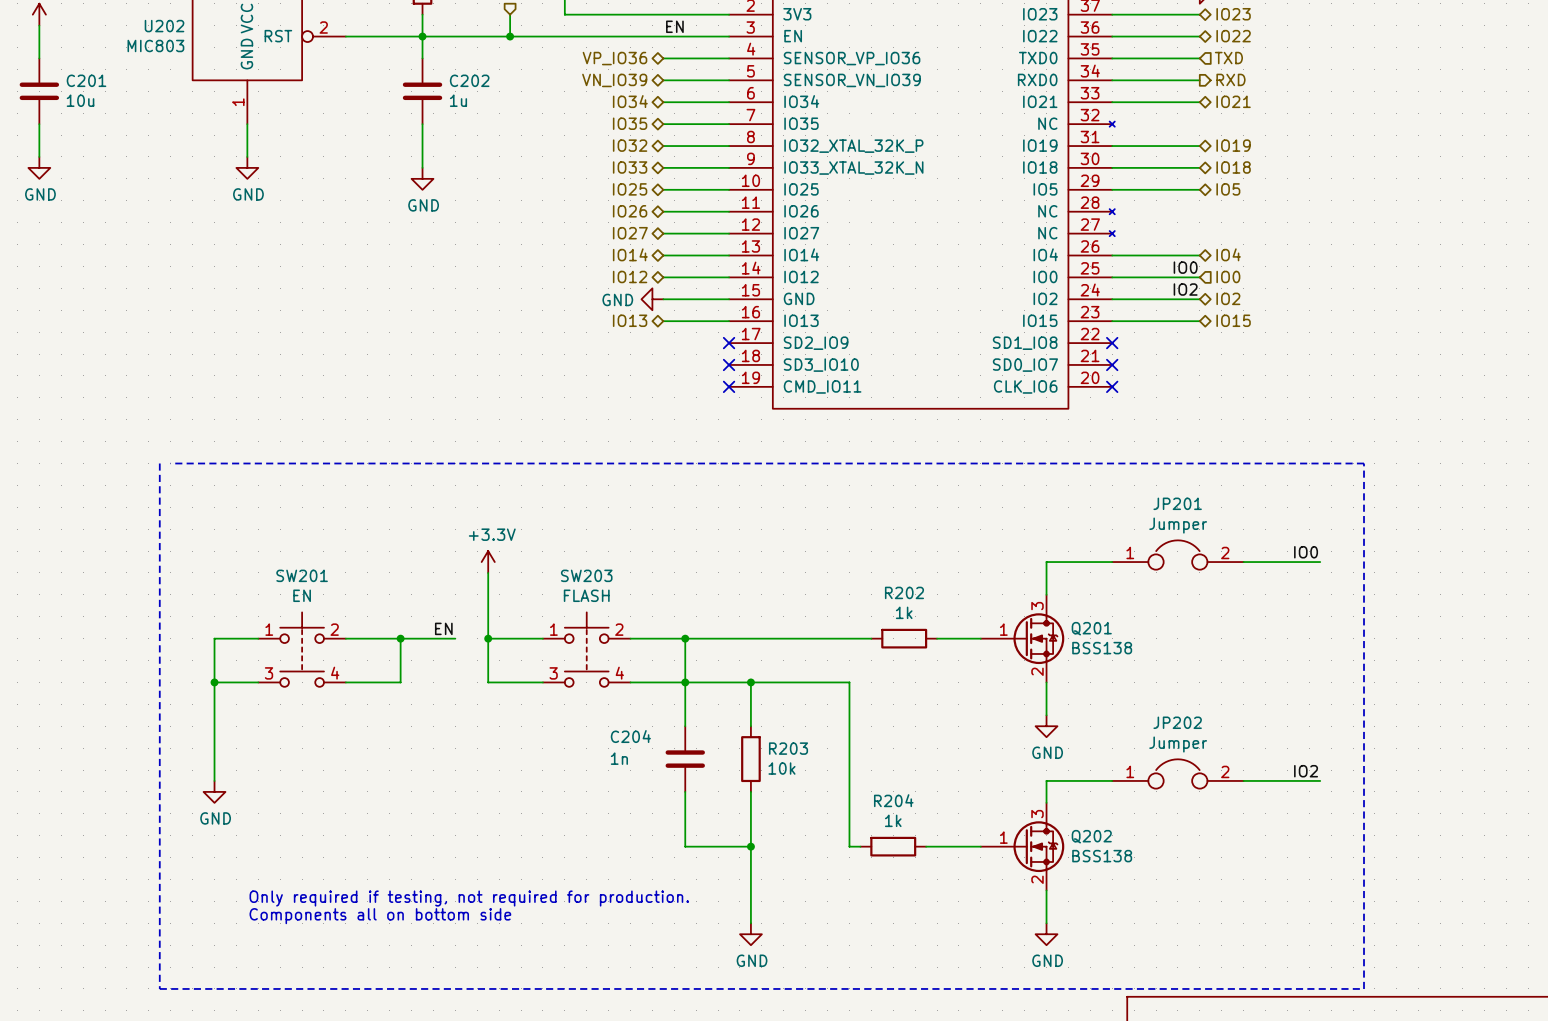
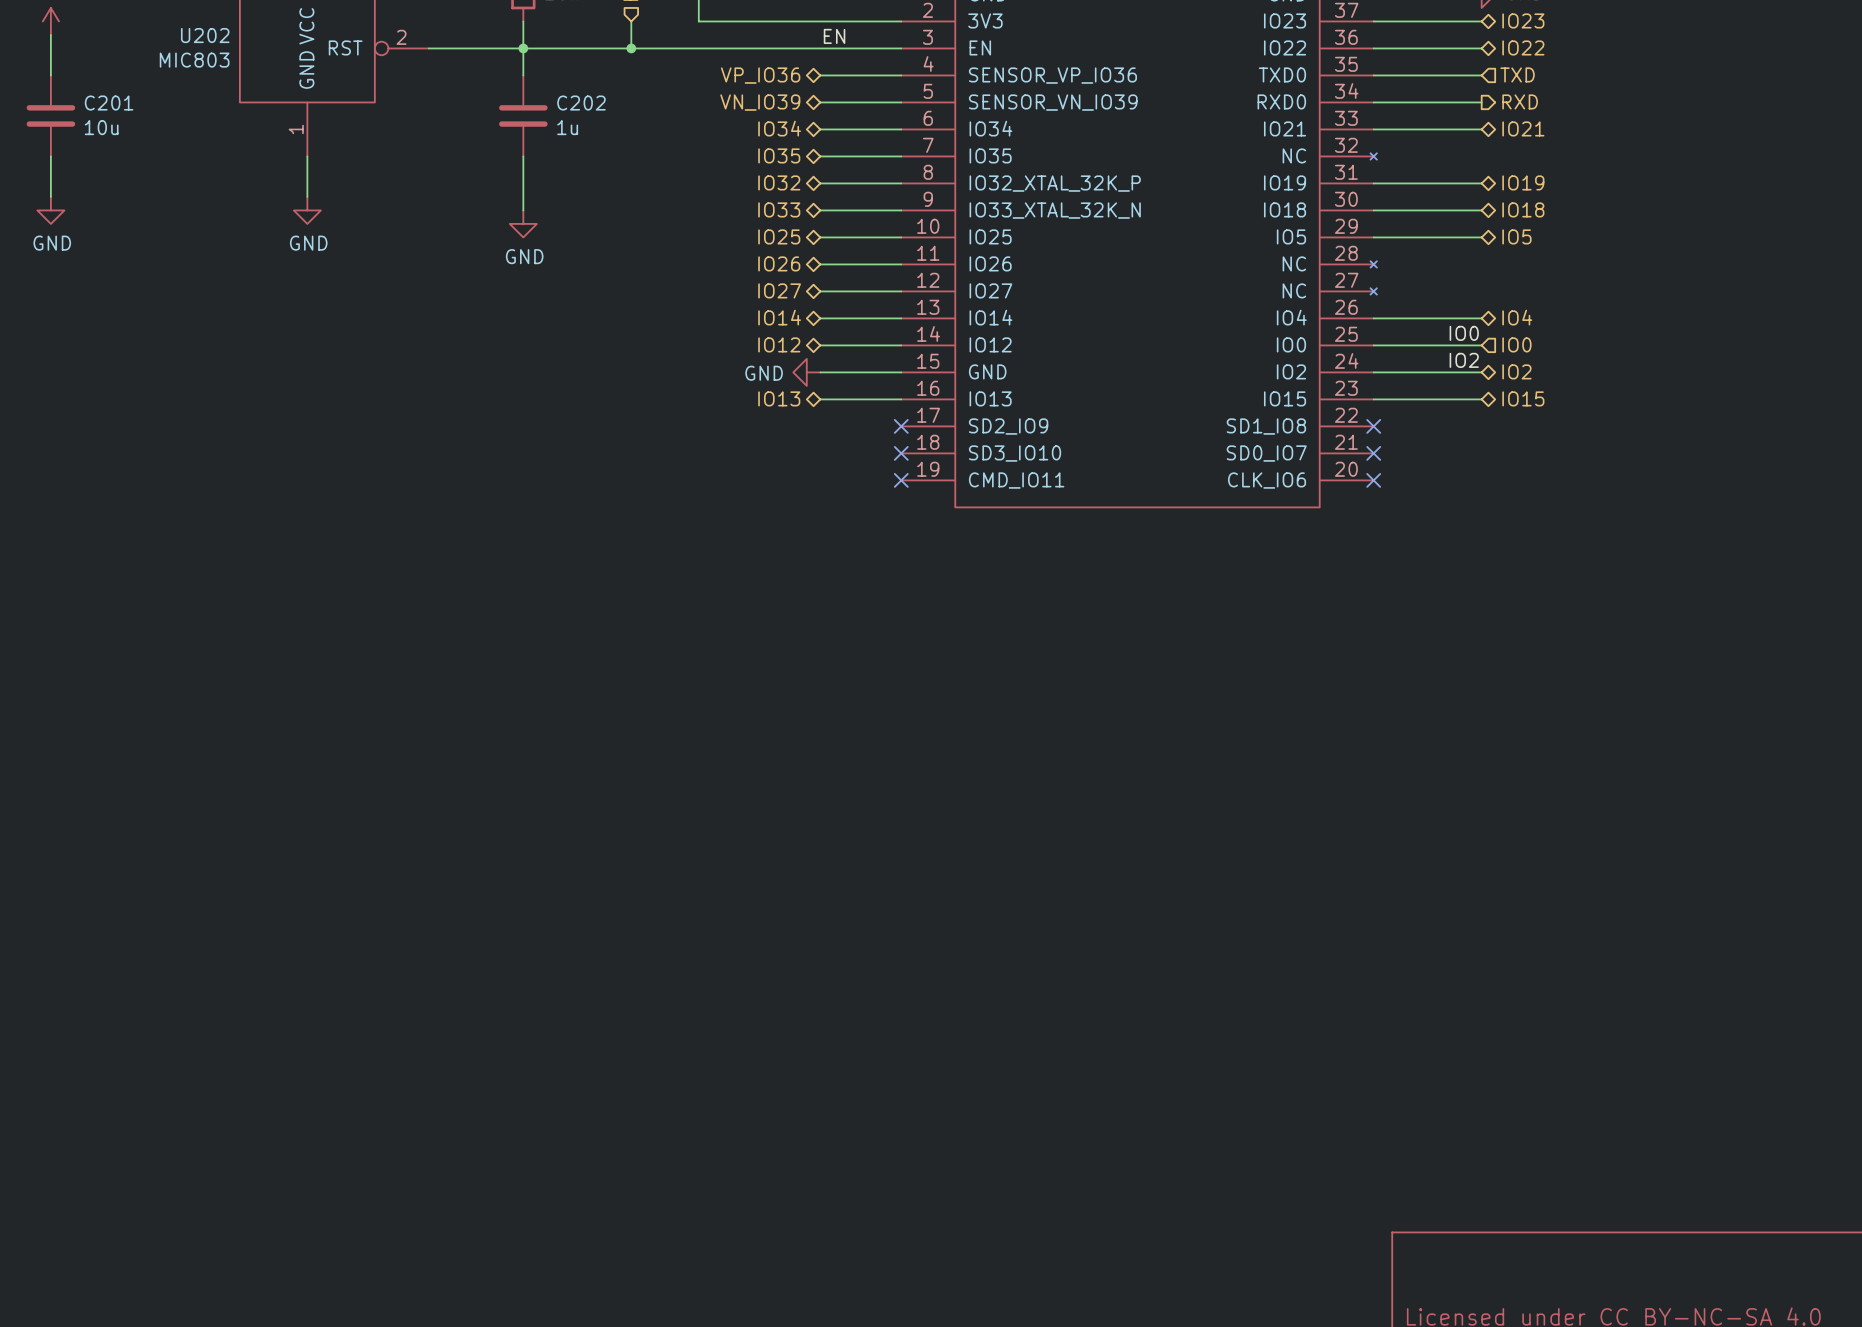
line: (159, 463) (159, 988) (1364, 988) (1364, 463) (170, 463) -> none
label: IO0 (1306, 552) -> none
JP201: Jumper (1177, 555) -> none
power symbol: +3.3V (488, 562) -> none
wire: (1112, 562) (1046, 562) (1046, 594) -> none
wire: (1243, 562) (1320, 562) -> none
wire: (488, 572) (488, 682) (542, 682) -> none
label: EN (443, 628) -> none
wire: (258, 638) (214, 638) (214, 780) -> none
wire: (345, 638) (455, 638) -> none
wire: (400, 638) (400, 682) (345, 682) -> none
junction: (400, 638) -> none
wire: (488, 638) (542, 638) -> none
junction: (488, 638) -> none
wire: (630, 638) (871, 638) -> none
wire: (685, 638) (685, 726) -> none
junction: (685, 638) -> none
R202: 1k (904, 638) -> none
wire: (937, 638) (980, 638) -> none
Q201: BSS138 (1022, 638) -> none
SW201: EN (302, 649) -> none
SW203: FLASH (586, 649) -> none
wire: (214, 682) (258, 682) -> none
junction: (214, 682) -> none
wire: (630, 682) (849, 682) (849, 846) (860, 846) -> none
junction: (685, 682) -> none
wire: (750, 682) (750, 726) -> none
junction: (750, 682) -> none
wire: (1046, 682) (1046, 715) -> none
power symbol: GND (1046, 726) -> none
C204: 1n (685, 759) -> none
R203: 10k (750, 759) -> none
label: IO2 (1306, 771) -> none
JP202: Jumper (1177, 773) -> none
wire: (1112, 780) (1046, 780) (1046, 802) -> none
wire: (1243, 780) (1320, 780) -> none
power symbol: GND (214, 791) -> none
wire: (685, 791) (685, 846) (750, 846) -> none
wire: (750, 791) (750, 923) -> none
junction: (750, 846) -> none
R204: 1k (893, 846) -> none
wire: (926, 846) (980, 846) -> none
Q202: BSS138 (1022, 846) -> none
wire: (1046, 890) (1046, 923) -> none
text: Only required if testing, not required for production. (469, 898) -> none
text: Components all on bottom side (380, 916) -> none
power symbol: GND (750, 934) -> none
power symbol: GND (1046, 934) -> none

